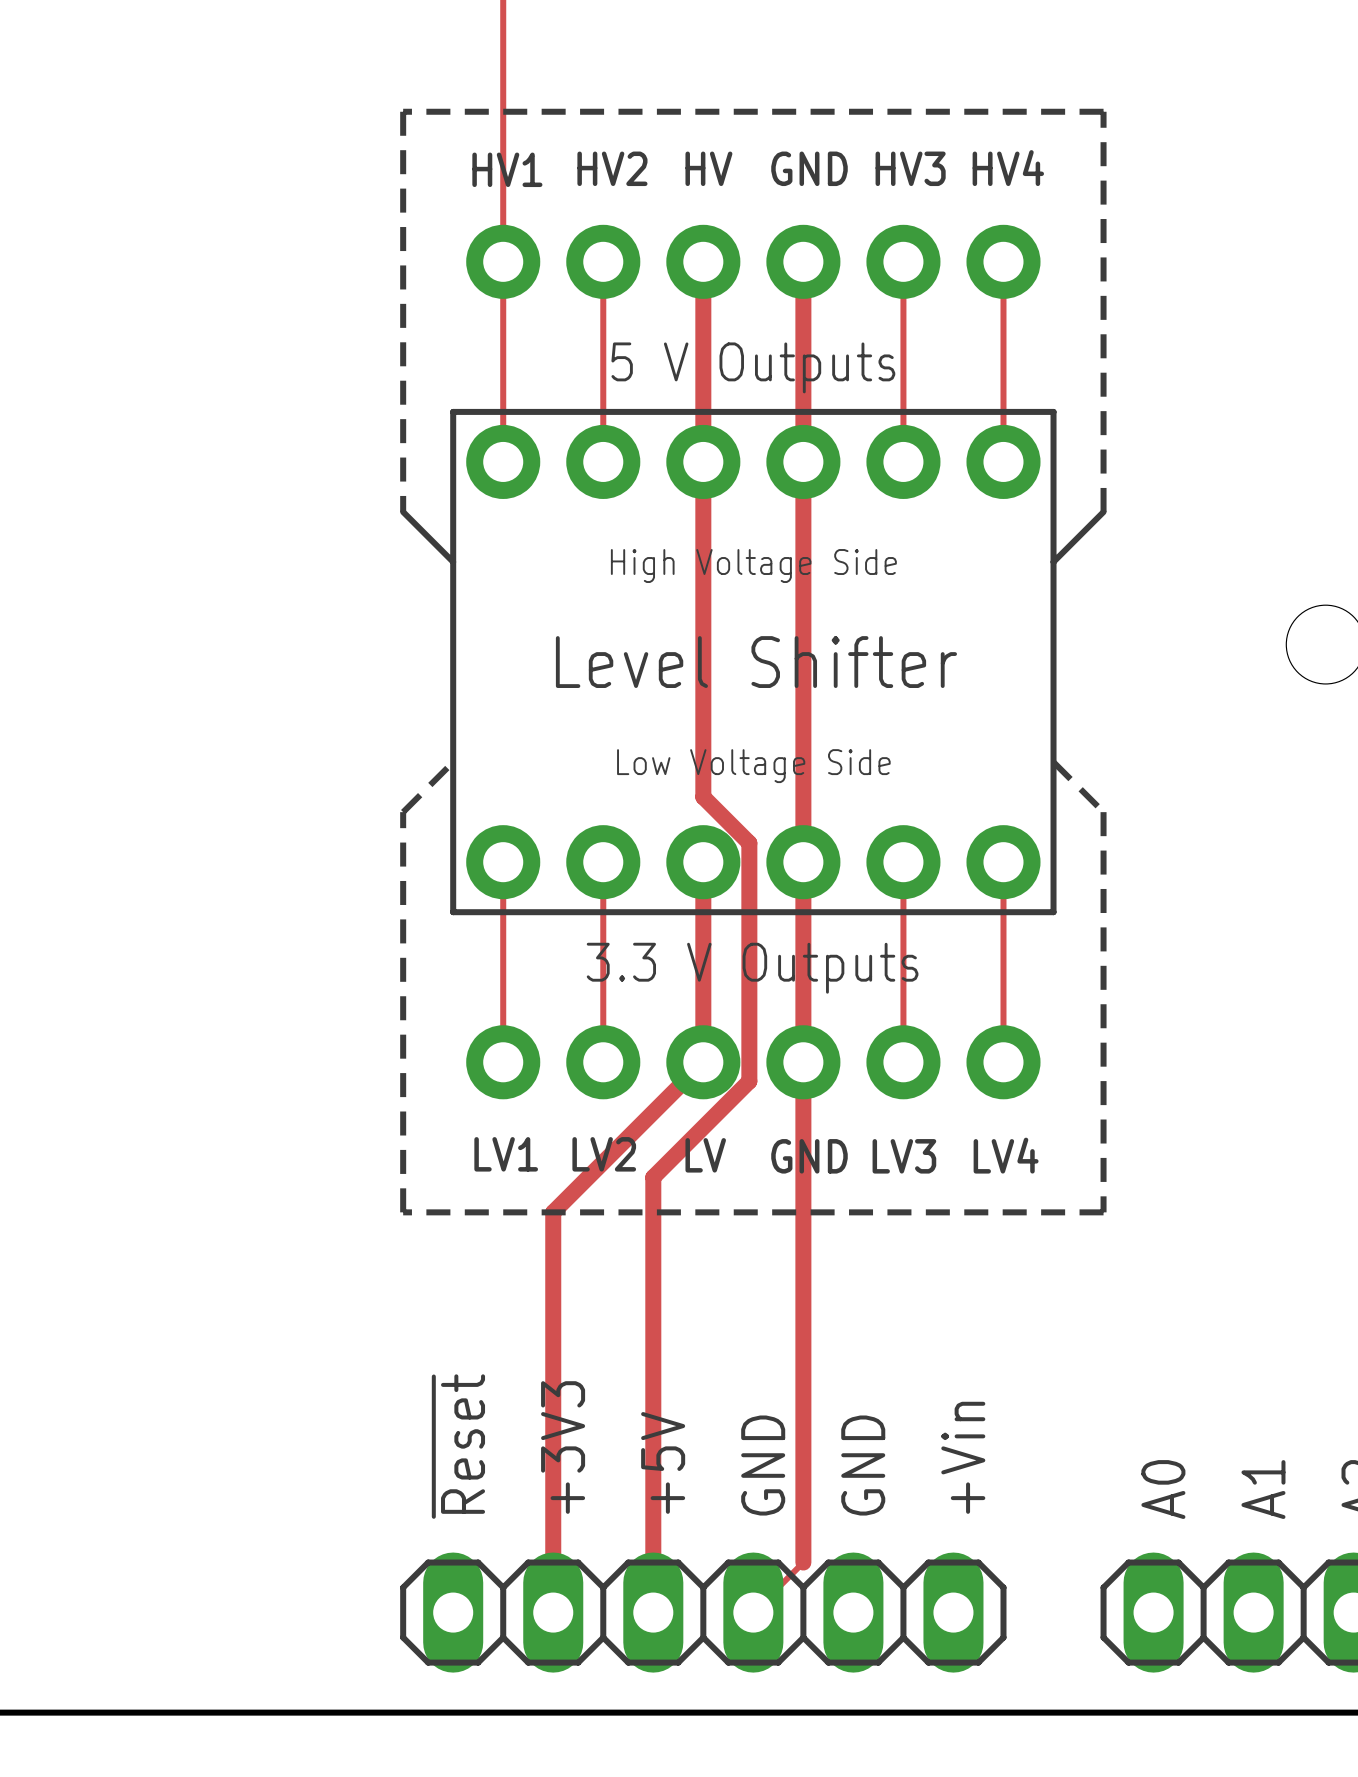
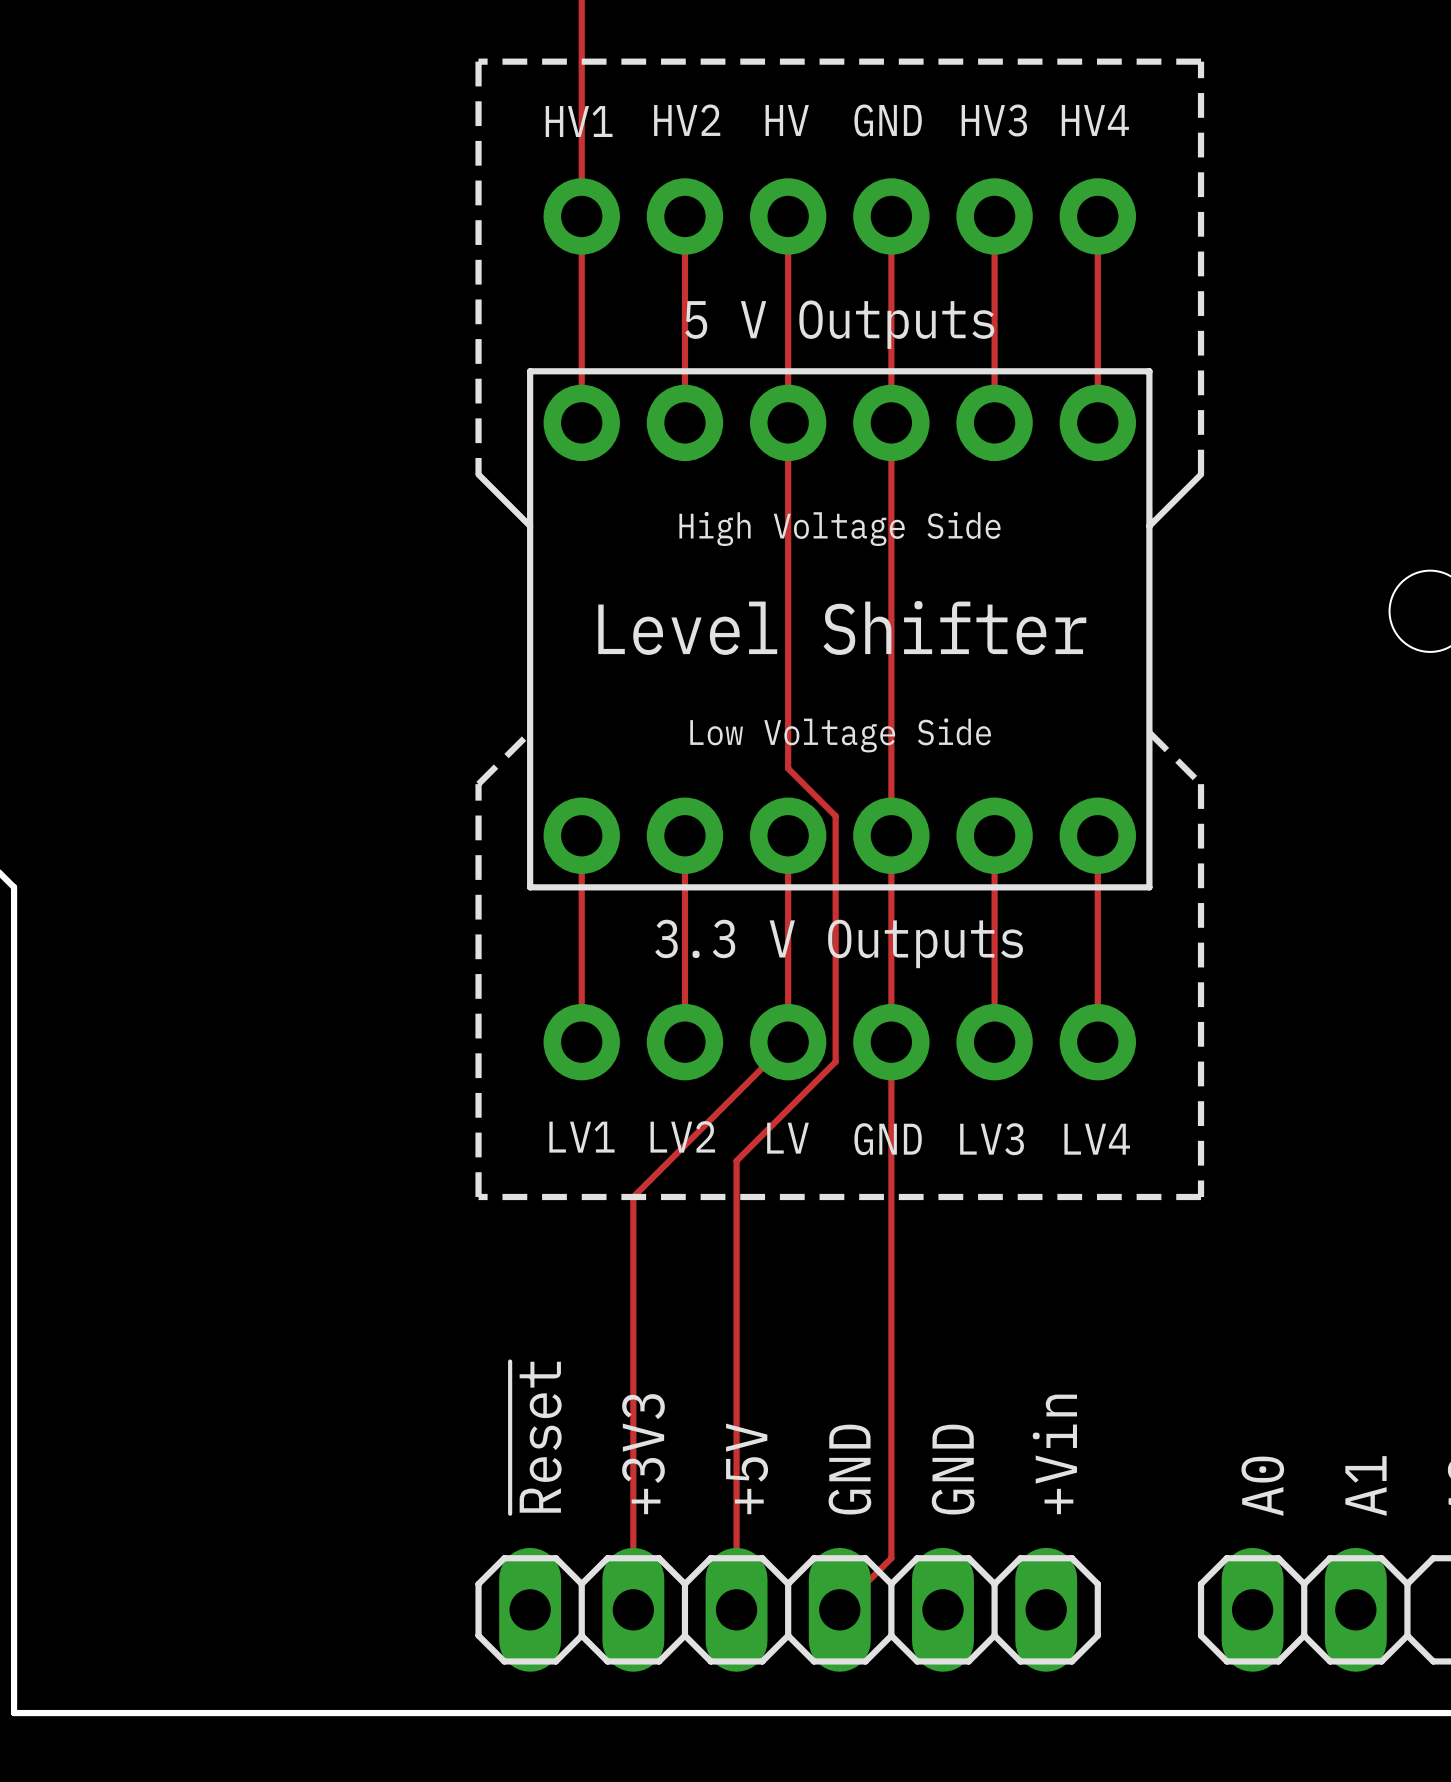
track width: thick (703, 261) (703, 797) (749, 843) (749, 1081) (653, 1177) (653, 1612) -> thin (788, 216) (788, 768) (835, 816) (835, 1061) (736, 1160) (736, 1609)
track width: thick (803, 261) (803, 1562) -> thin (891, 216) (891, 1558)
track width: thick (703, 862) (703, 1062) (553, 1212) (553, 1612) -> thin (788, 835) (788, 1042) (633, 1196) (633, 1609)

